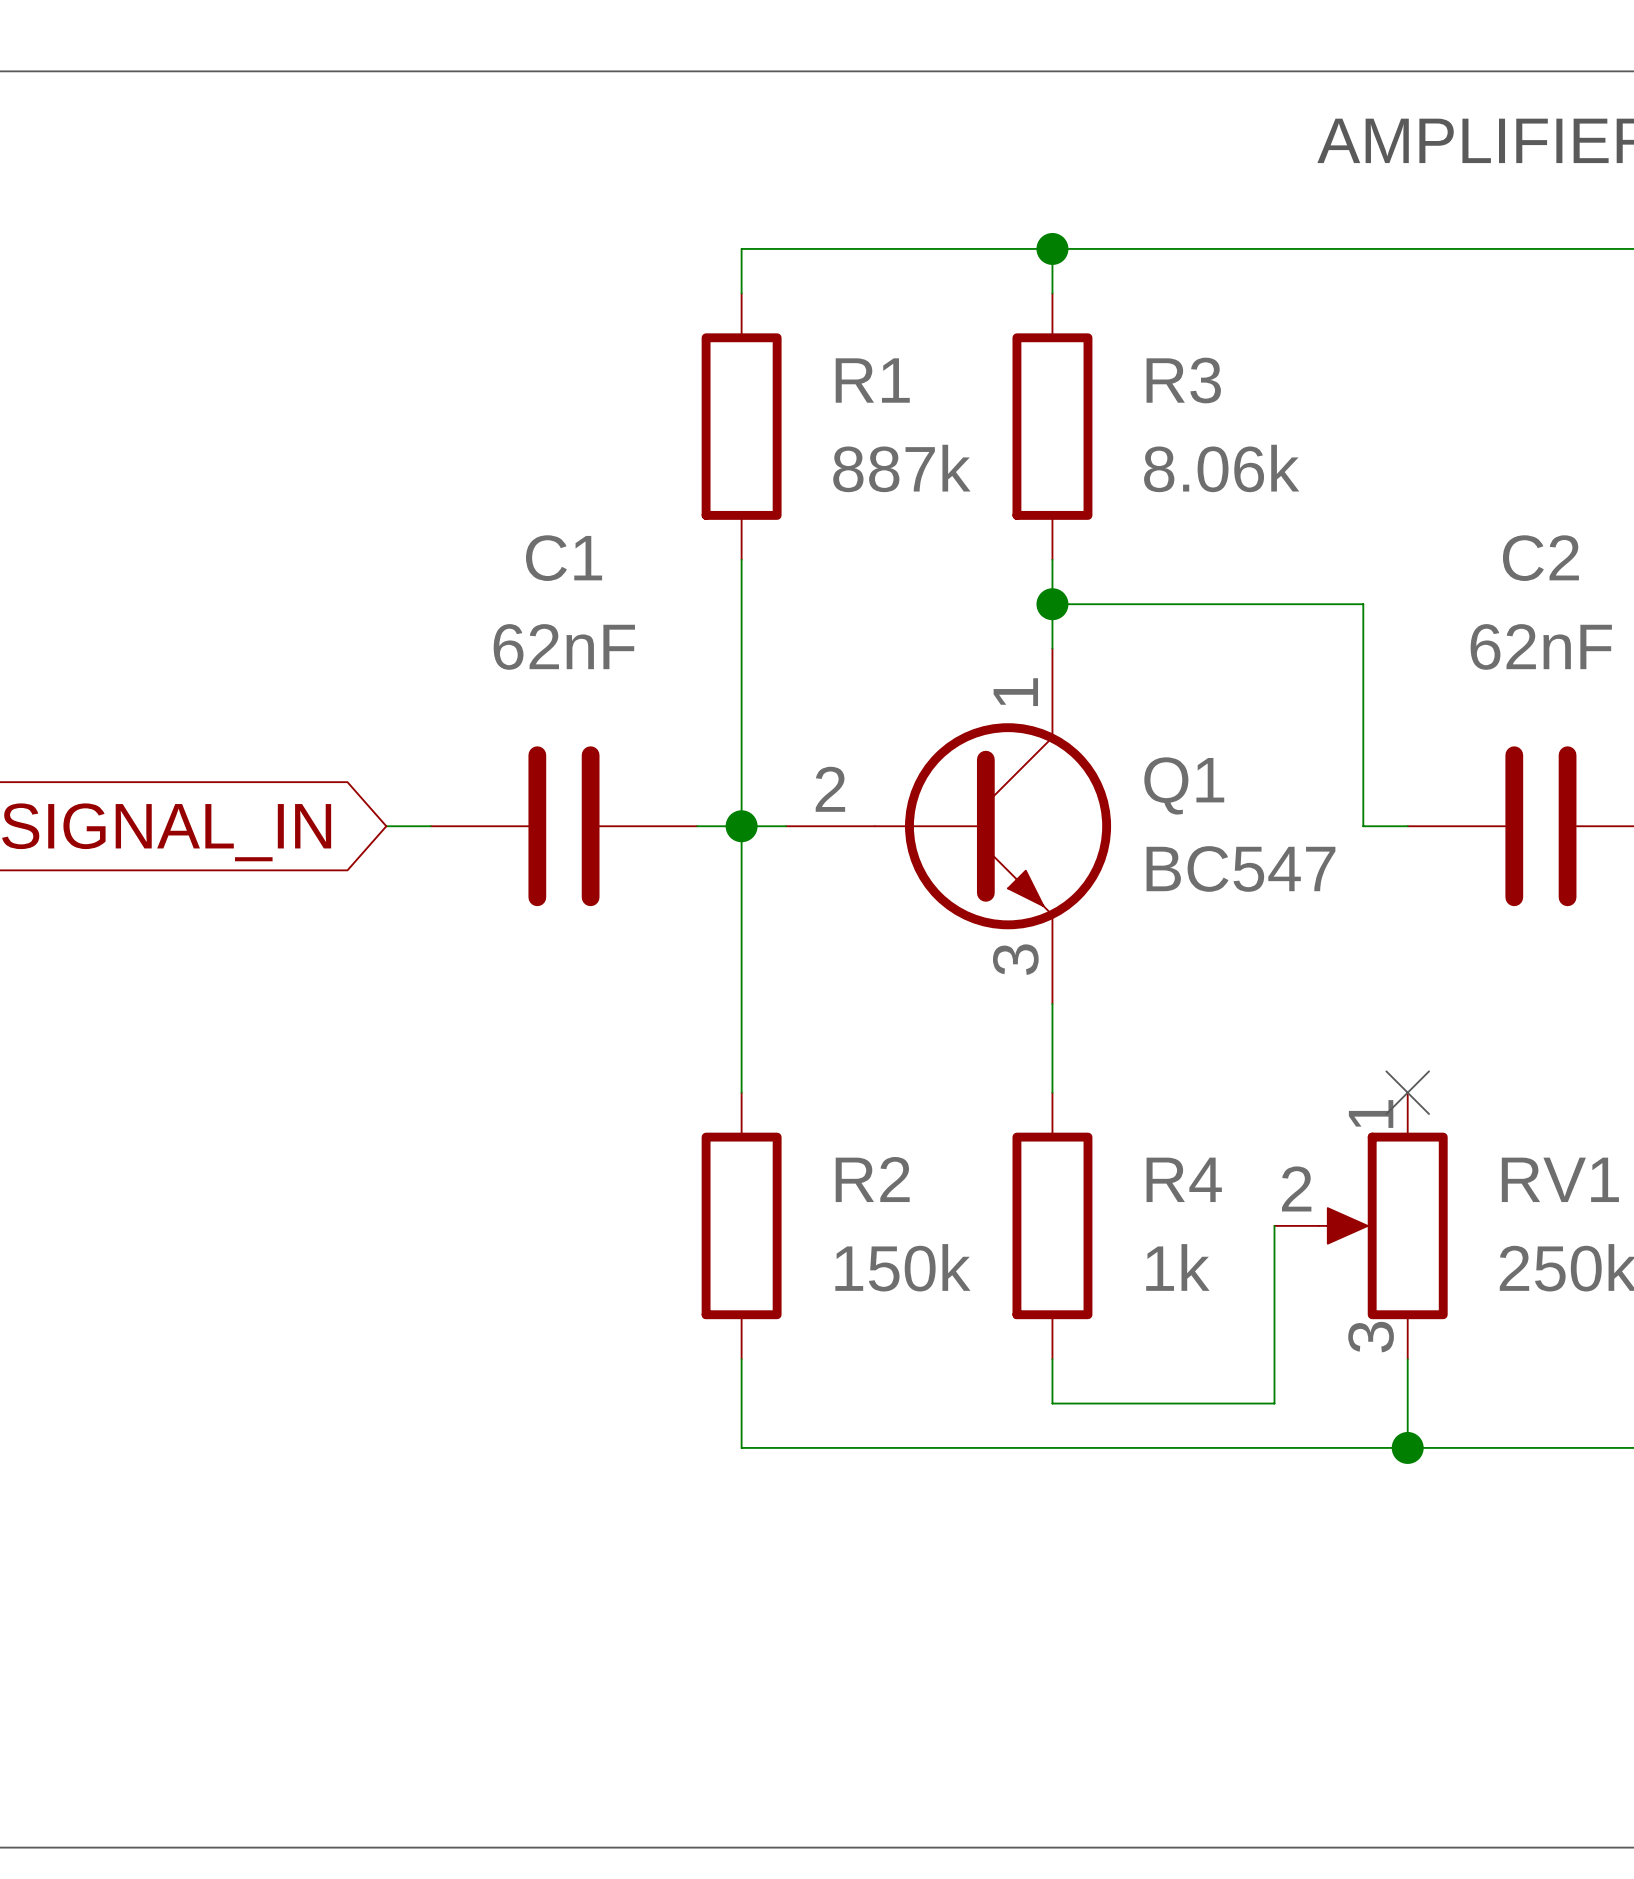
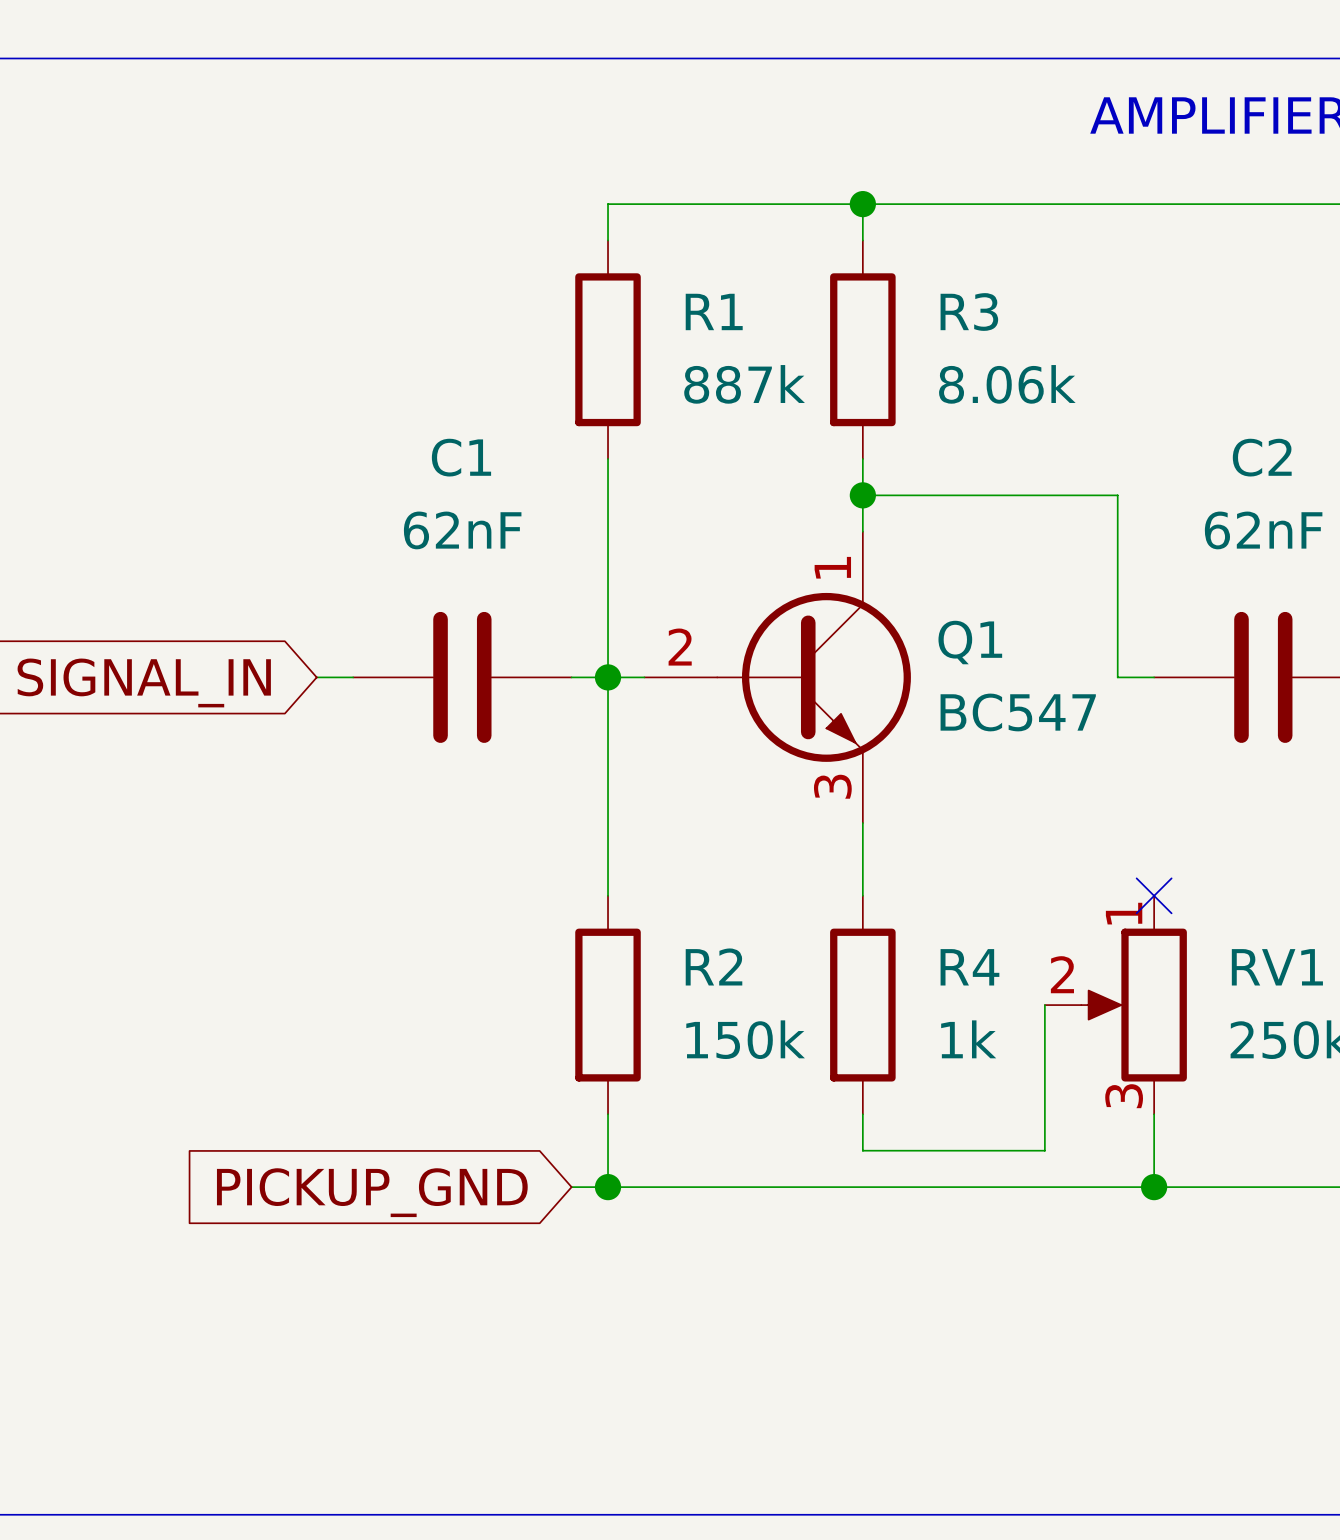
wire: none -> (571, 1187) (608, 1187)
junction: none -> (608, 1187)
global label: none -> PICKUP_GND (372, 1192)

